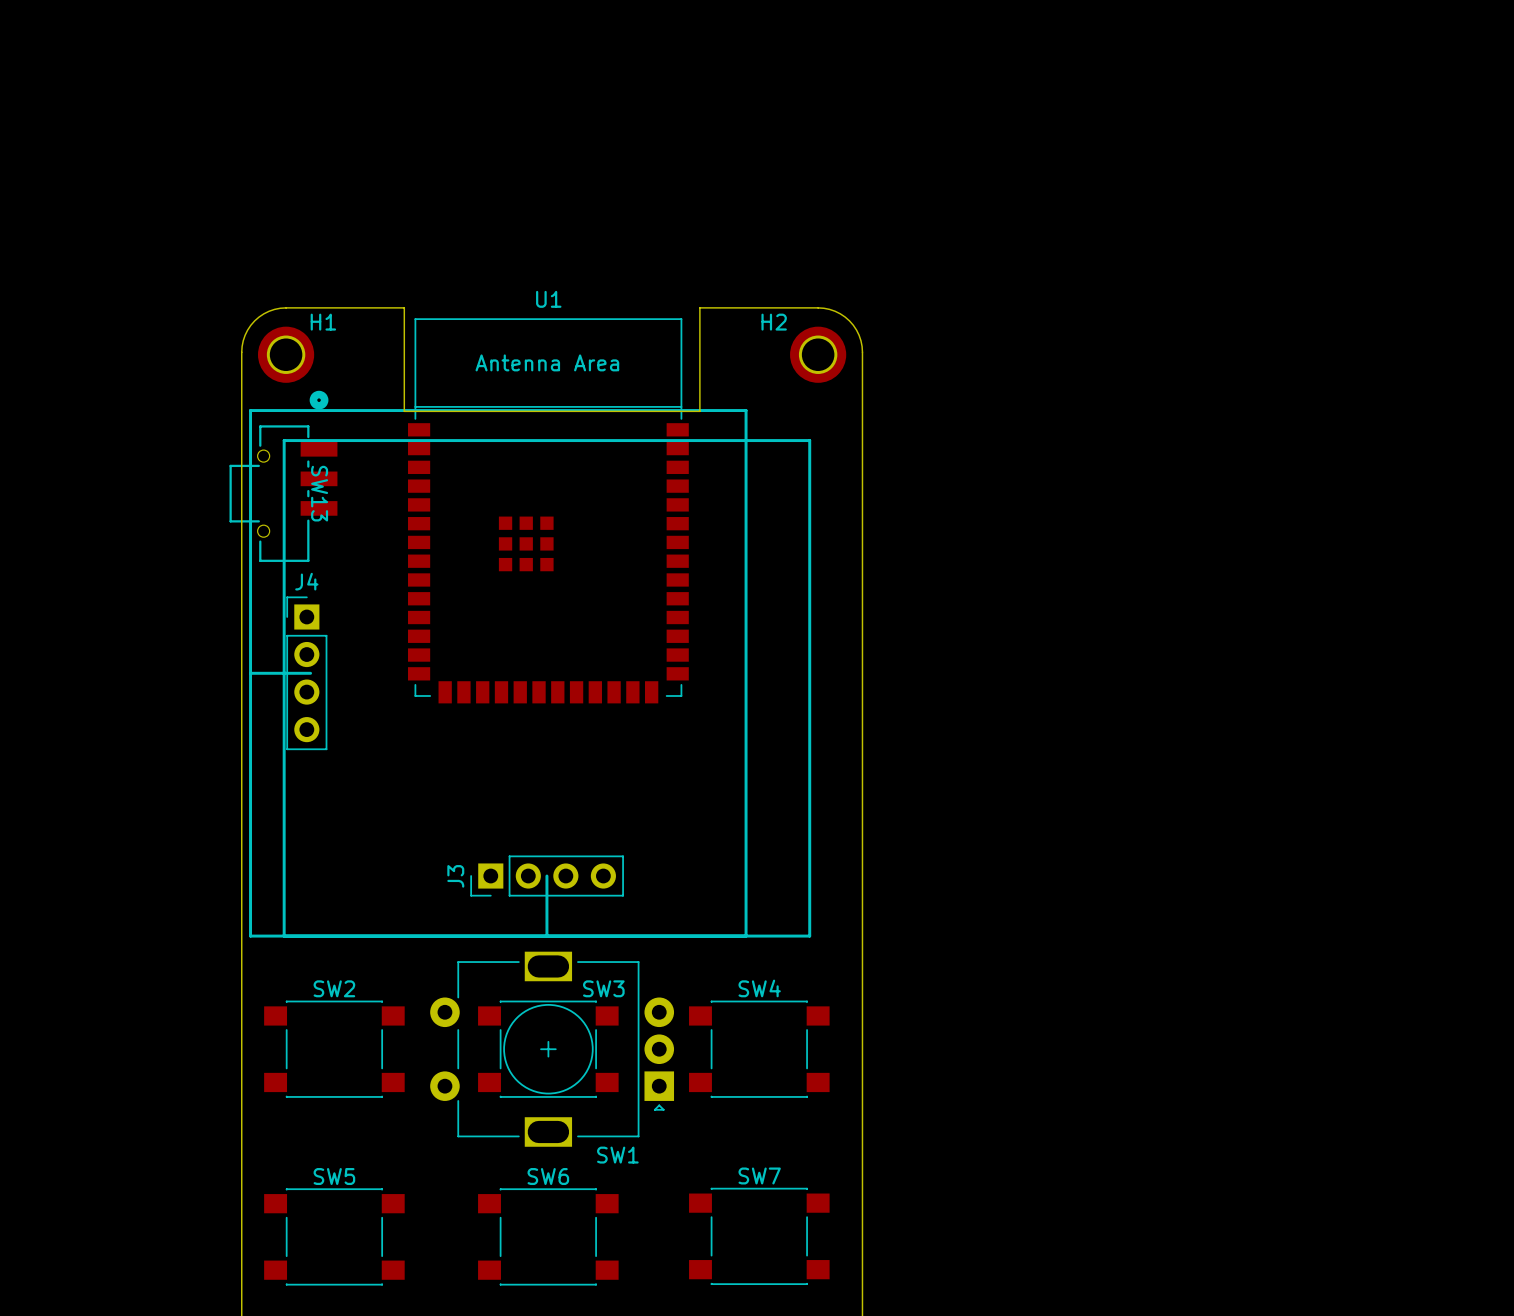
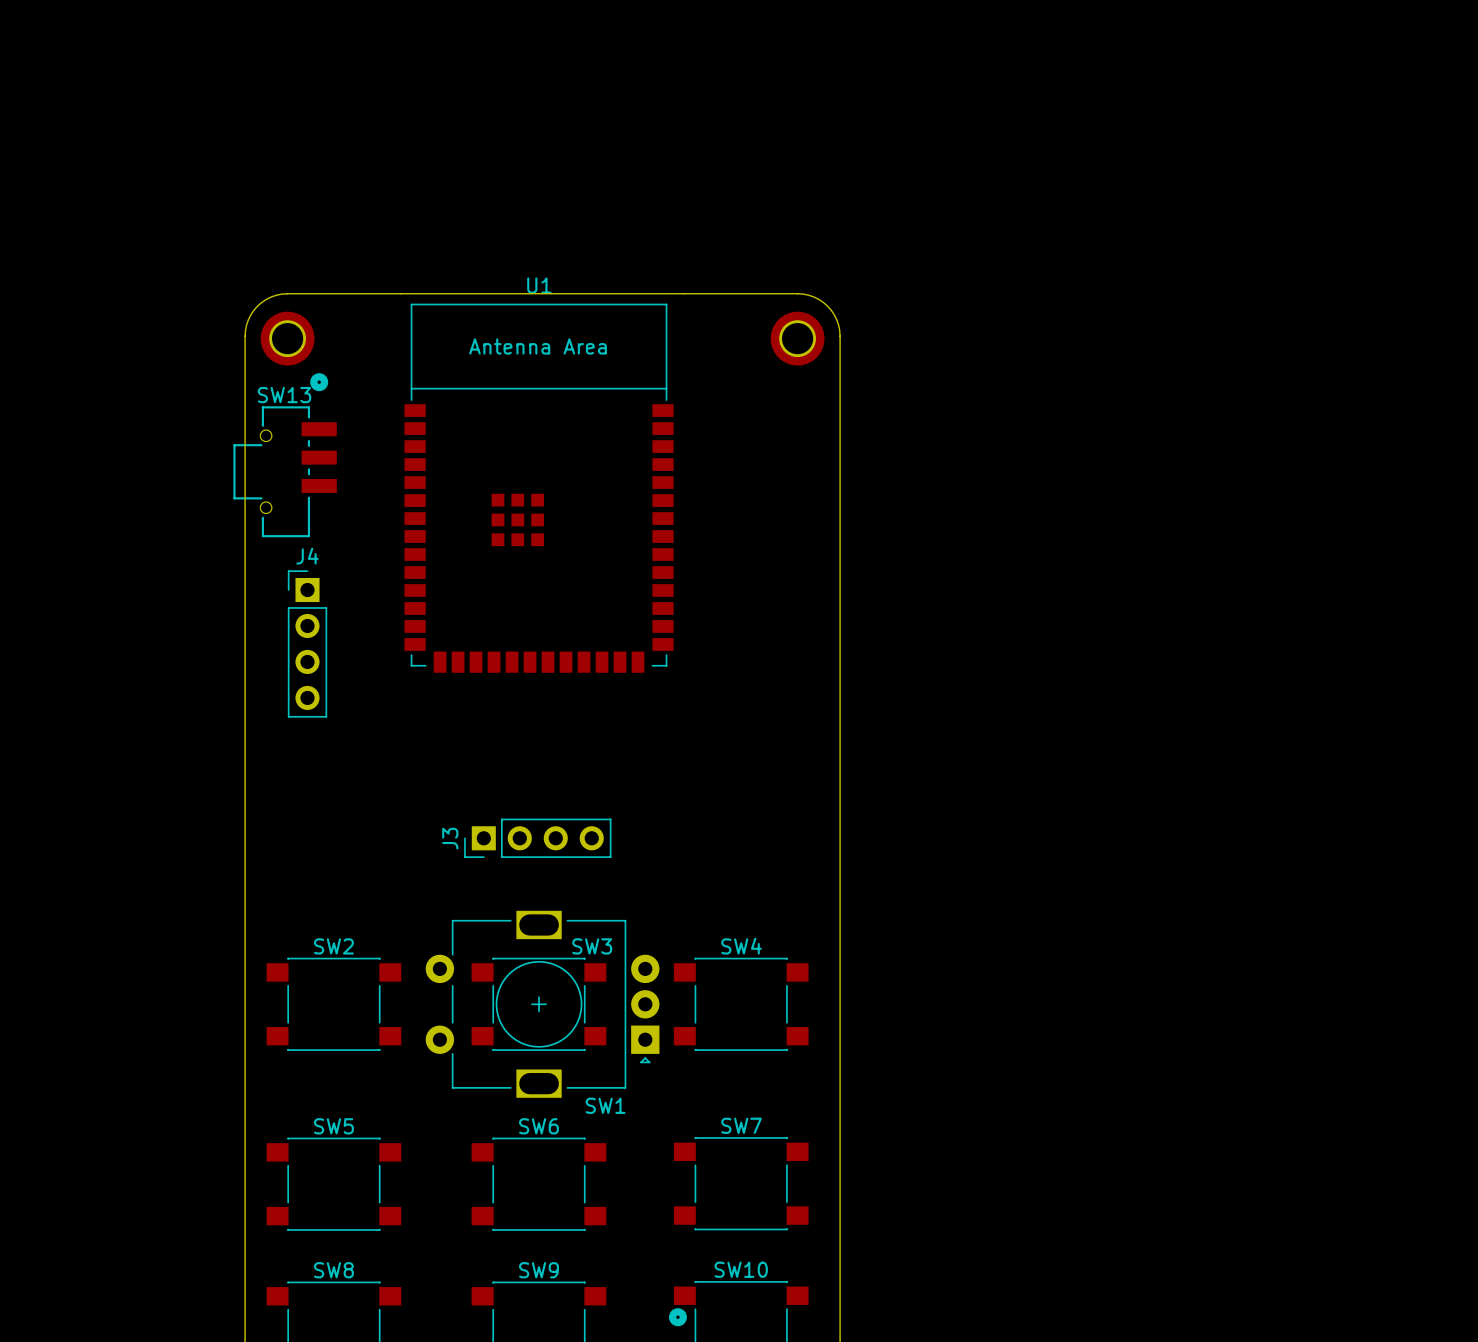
board edge: (404, 307) (404, 411) (699, 411) (699, 307) -> (400, 293) (684, 293)
H1 name: H1 (323, 322) -> none
H2 name: H2 (774, 322) -> none
SW13 name rotation: 0° (319, 493) -> 90° counterclockwise (284, 395)
SW13 name position: SW13 (319, 493) -> SW13 (284, 395)
line: (250, 673) (310, 673) -> none
line: (546, 876) (546, 936) -> none
line: (284, 936) (284, 440) (809, 440) (809, 936) (250, 936) (250, 410) (746, 410) (746, 936) -> none

